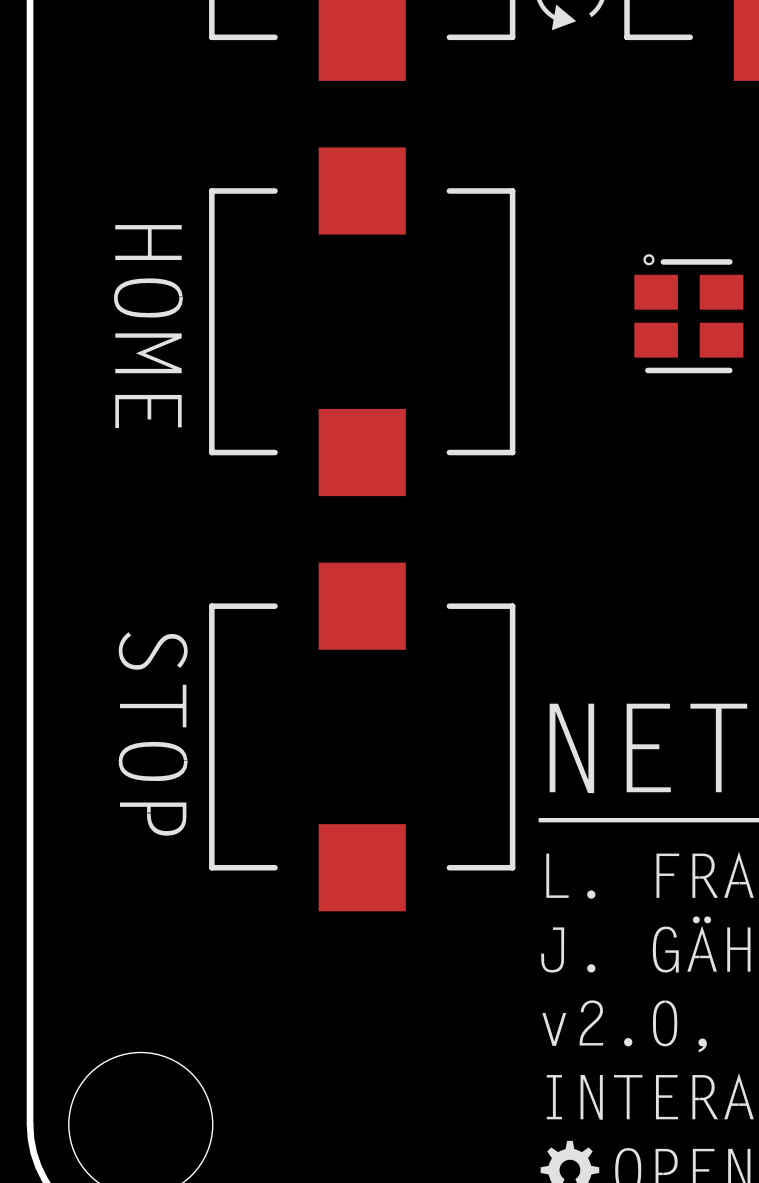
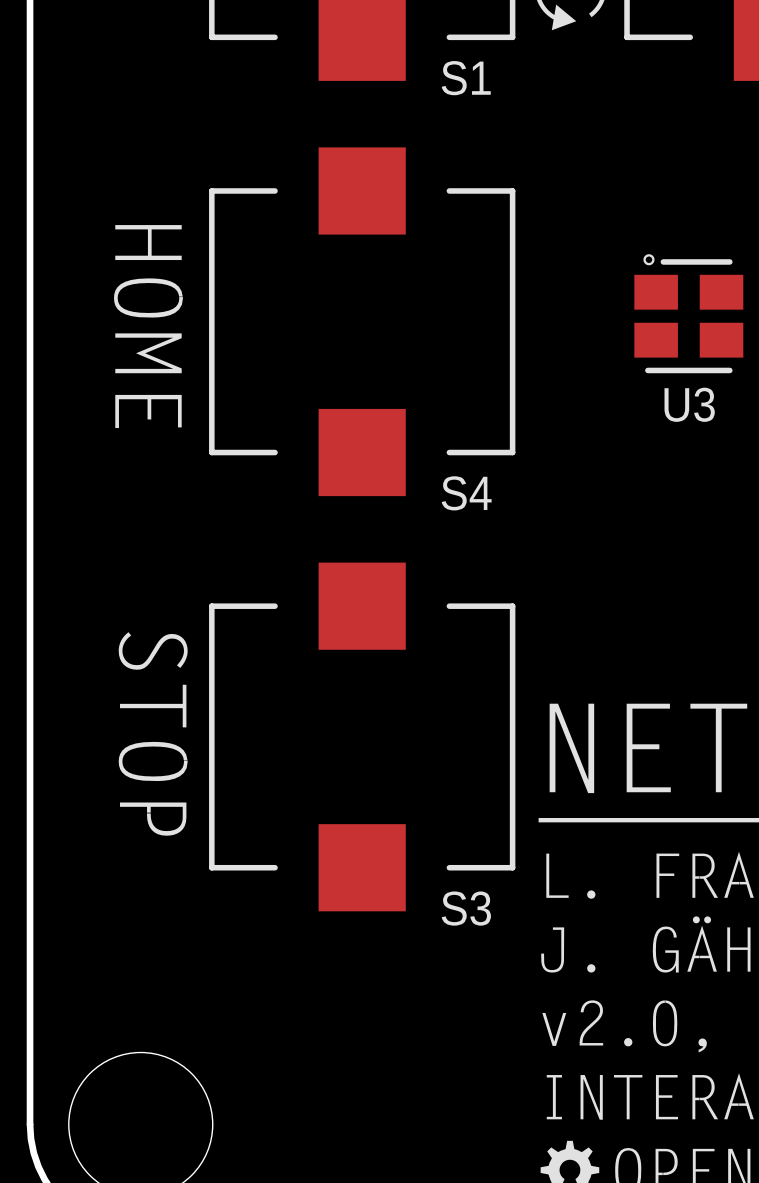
text: none -> S1 (466, 78)
text: none -> U3 (689, 404)
text: none -> S4 (466, 493)
text: none -> S3 (466, 908)

